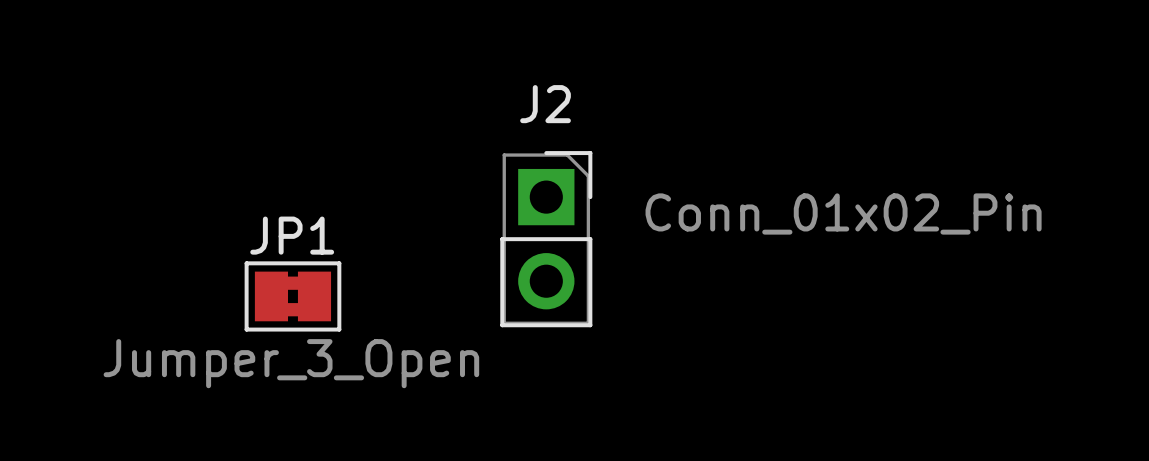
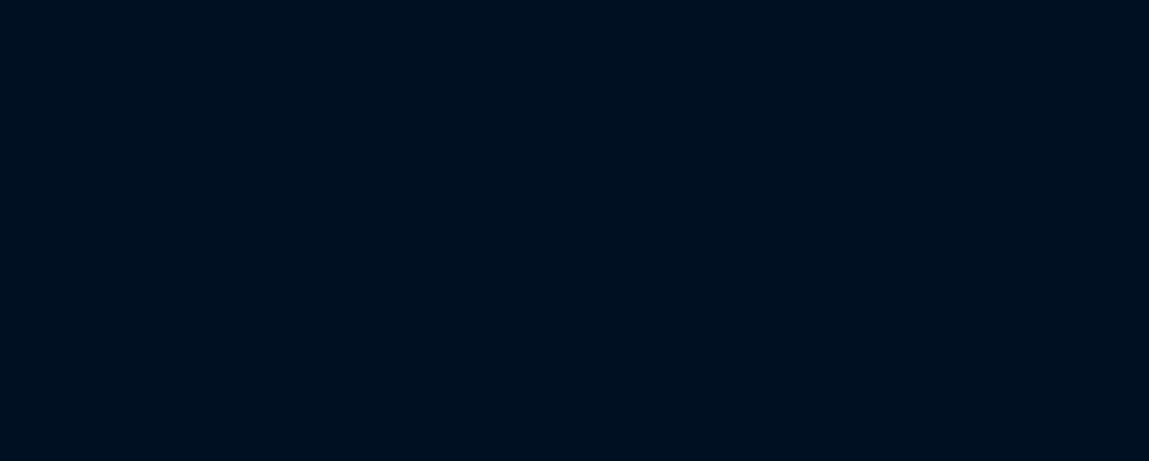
J2: Conn_01x02_Pin (546, 239) -> none
JP1: Jumper_3_Open (292, 296) -> none

